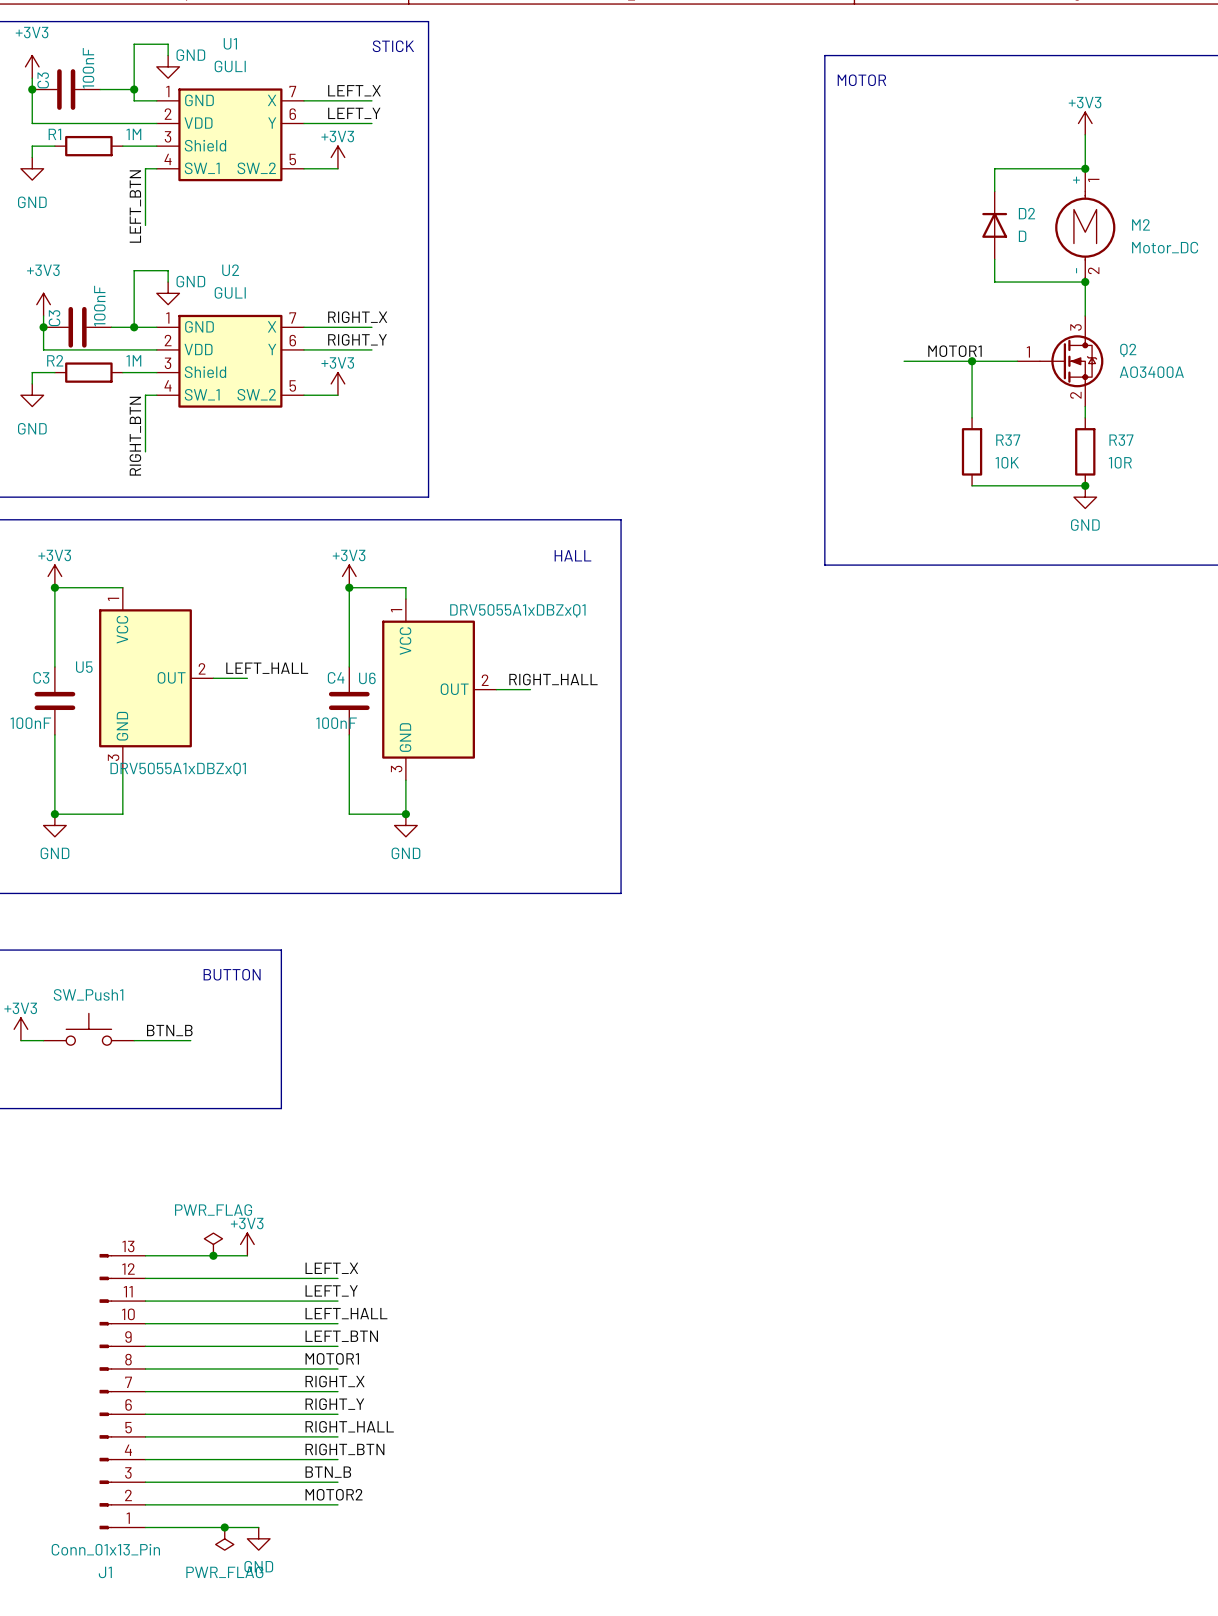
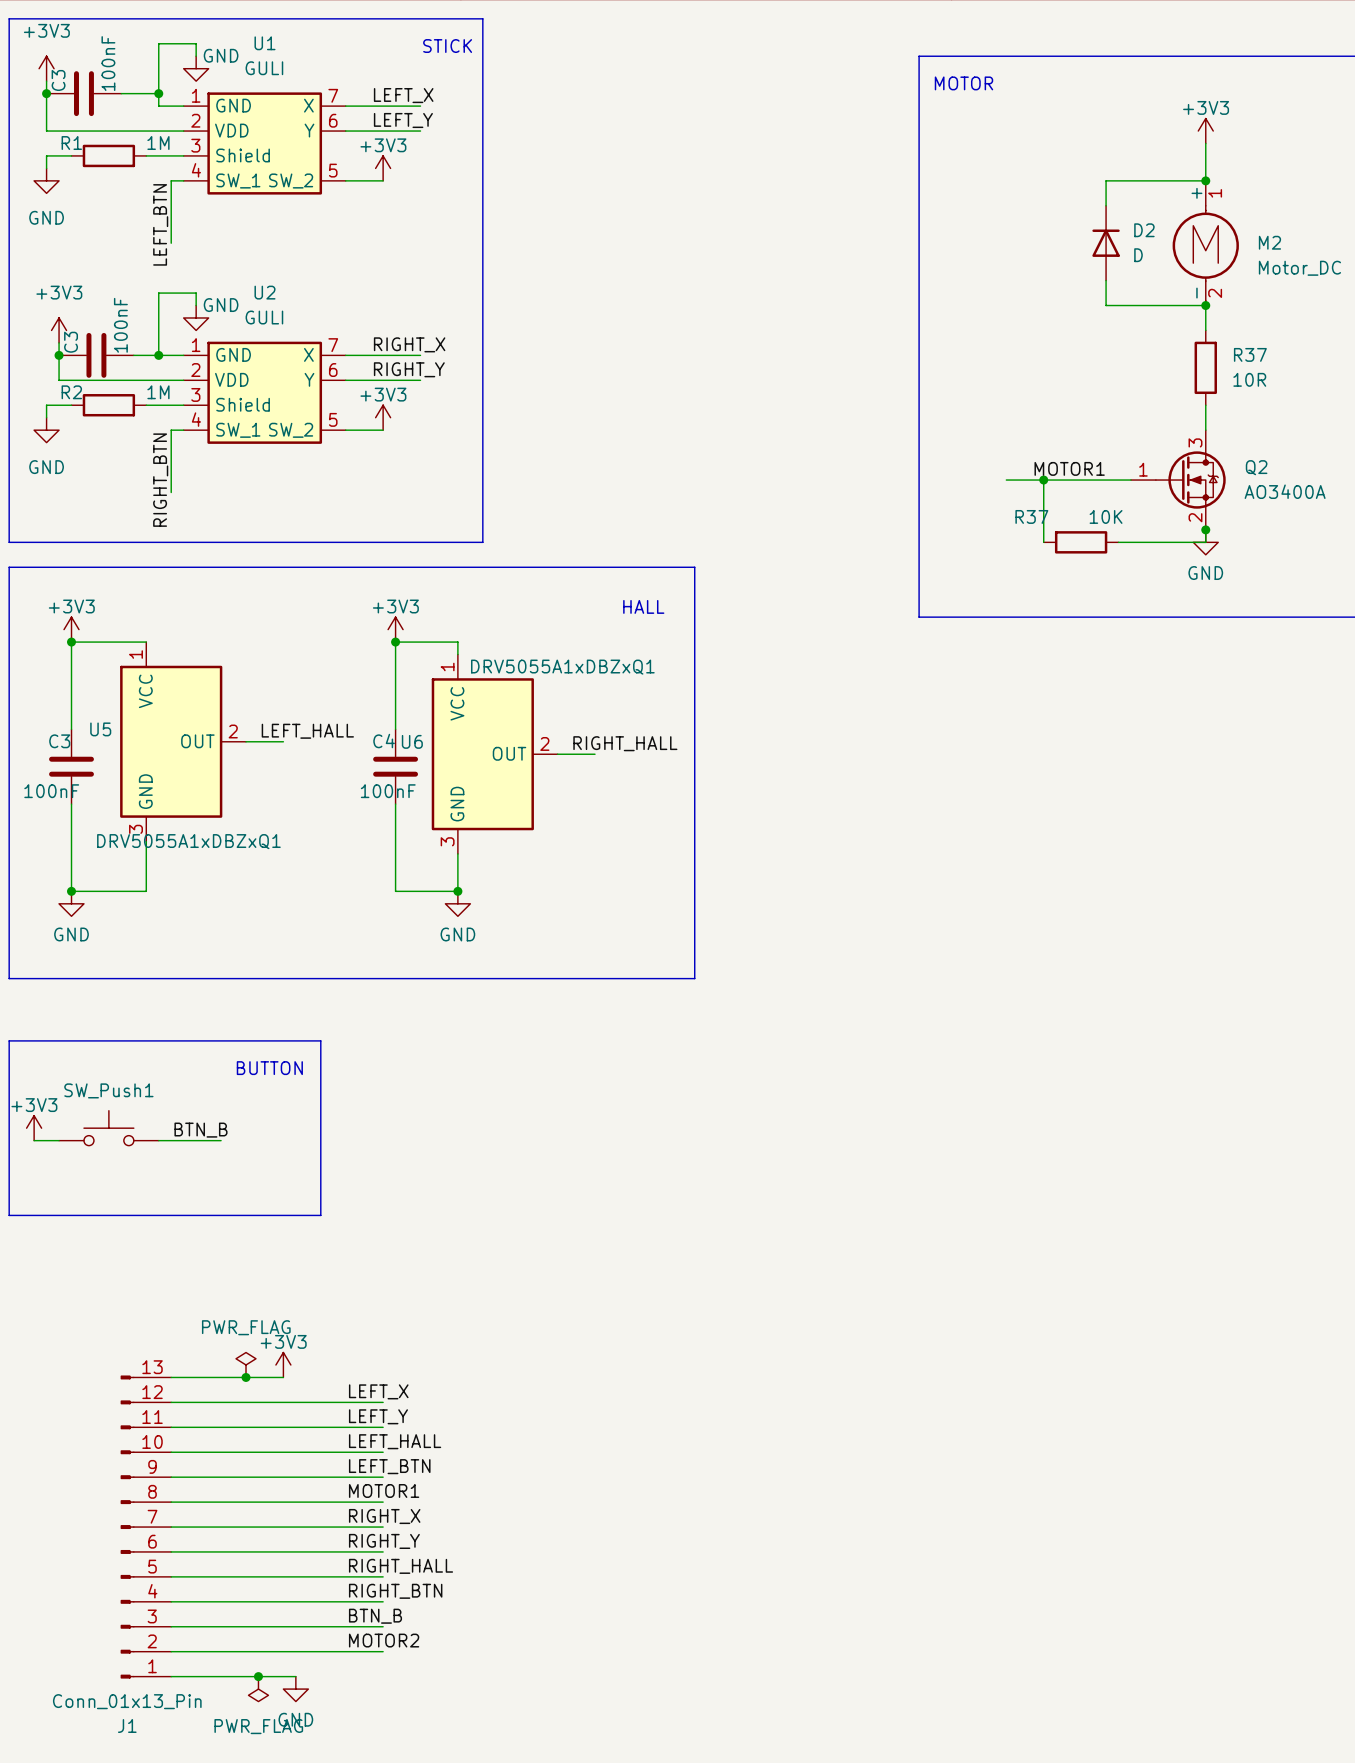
label position: MOTOR1 (954, 351) -> MOTOR1 (1069, 468)
wire: (904, 361) (1017, 361) -> (1006, 480) (1130, 480)
wire: (972, 361) (972, 417) -> (1043, 480) (1043, 542)
junction: (972, 361) -> none
Q2 position: (1060, 361) -> (1178, 480)
junction: none -> (1043, 480)
R37 name position: R37 (1008, 440) -> R37 (1031, 516)
R37 rotation: 0° (972, 451) -> 90° clockwise (1081, 542)
R37 position: (972, 451) -> (1081, 542)
R37 position: (1085, 451) -> (1205, 367)
R37 value position: 10K (1007, 462) -> 10K (1106, 516)
wire: (972, 485) (1085, 485) -> (1118, 542) (1205, 542) (1205, 529)

